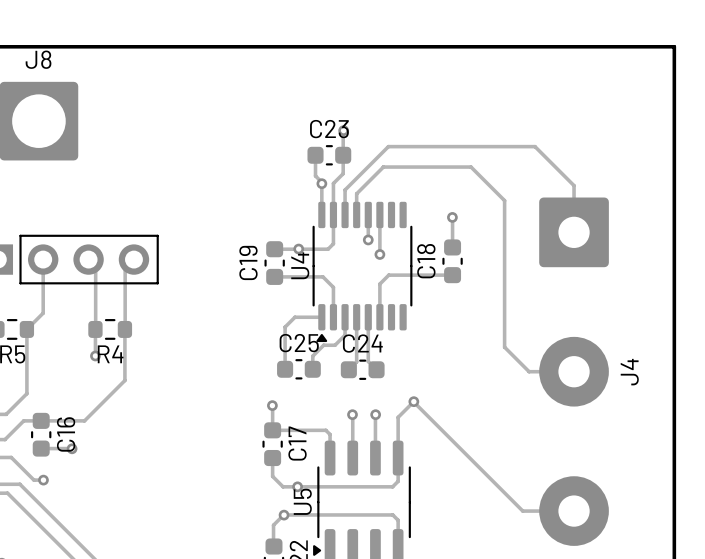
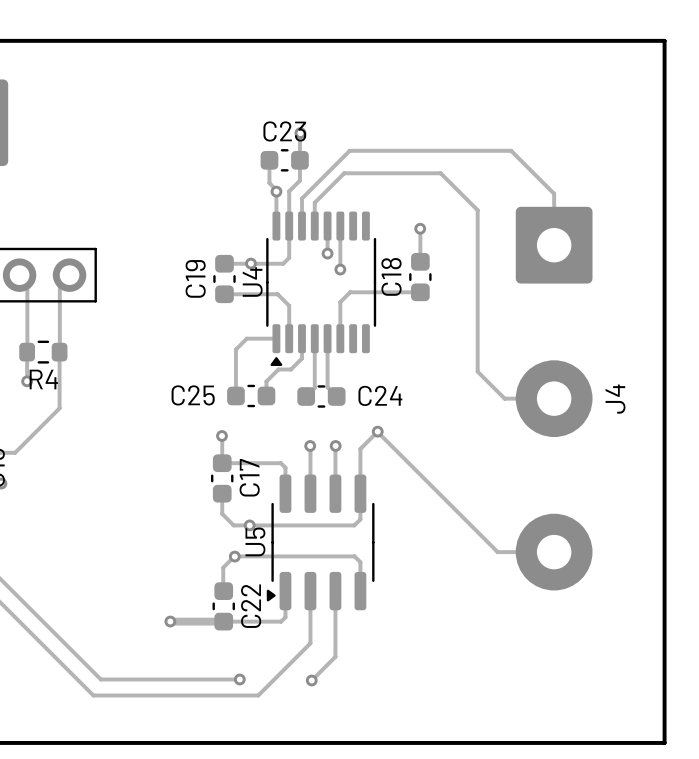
C25 name position: C25 (299, 343) -> C25 (193, 395)
C24 name position: C24 (362, 343) -> C24 (380, 395)

